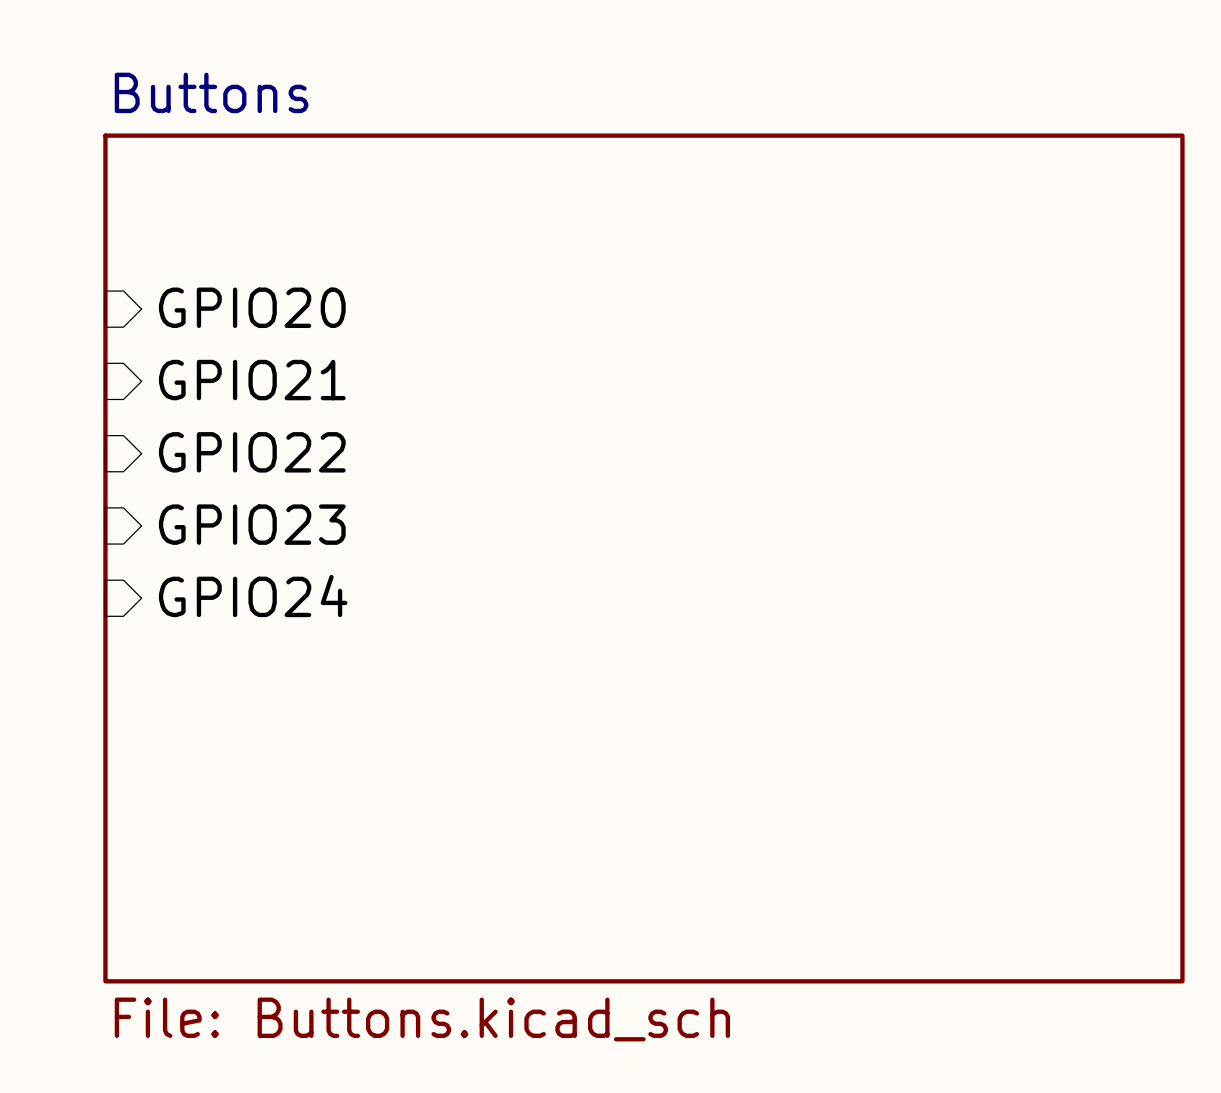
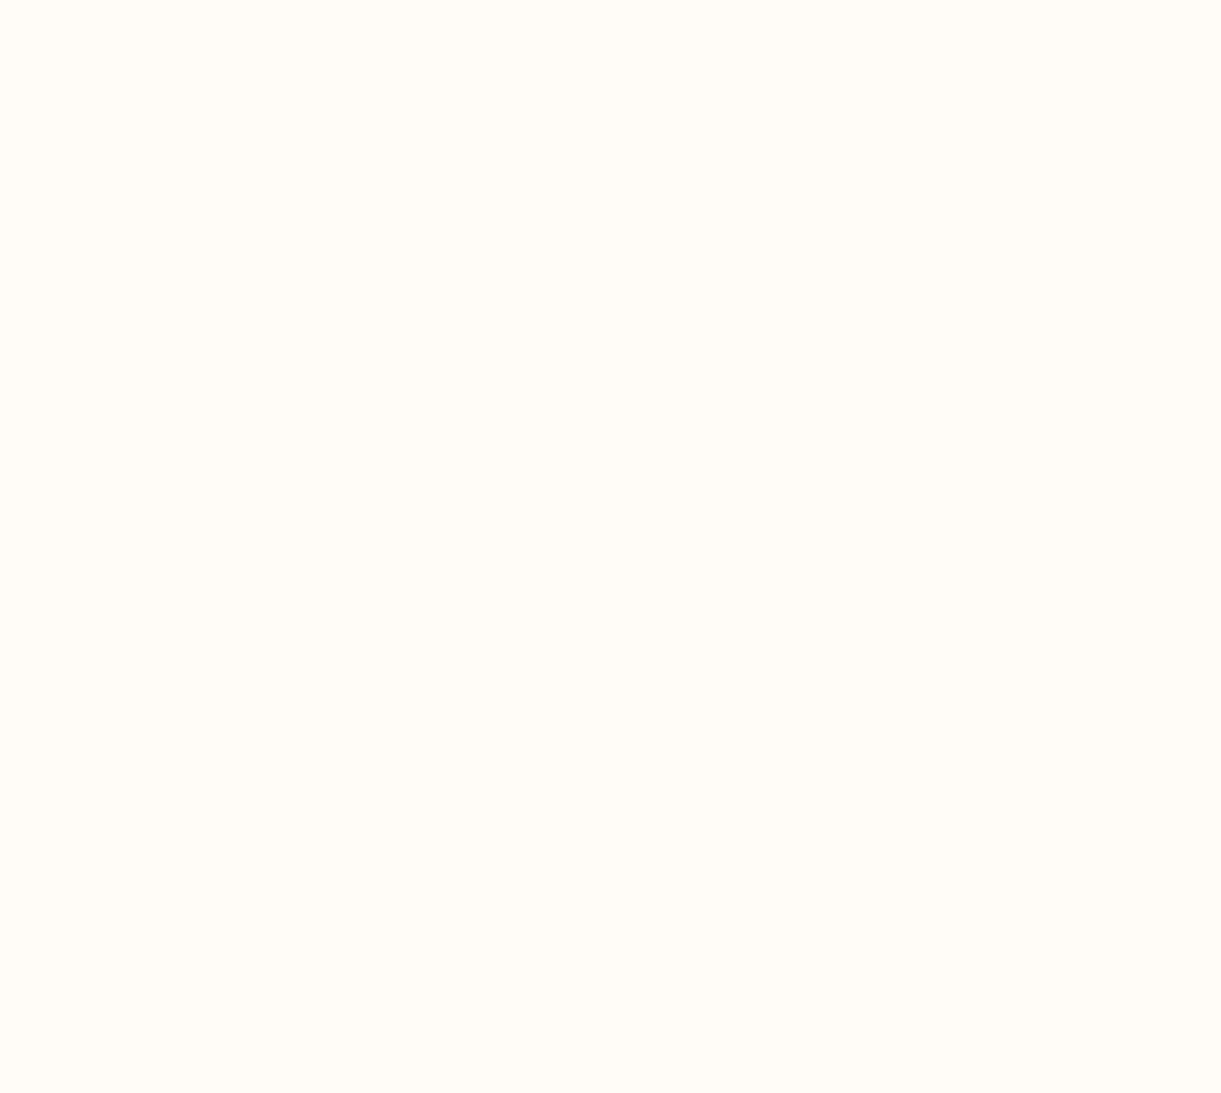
sheet pin: GPIO20 (252, 307) -> none
sheet pin: GPIO21 (252, 380) -> none
sheet pin: GPIO22 (252, 452) -> none
sheet pin: GPIO23 (252, 524) -> none
sheet Buttons: File: Buttons.kicad_sch (643, 558) -> none
sheet pin: GPIO24 (253, 596) -> none

